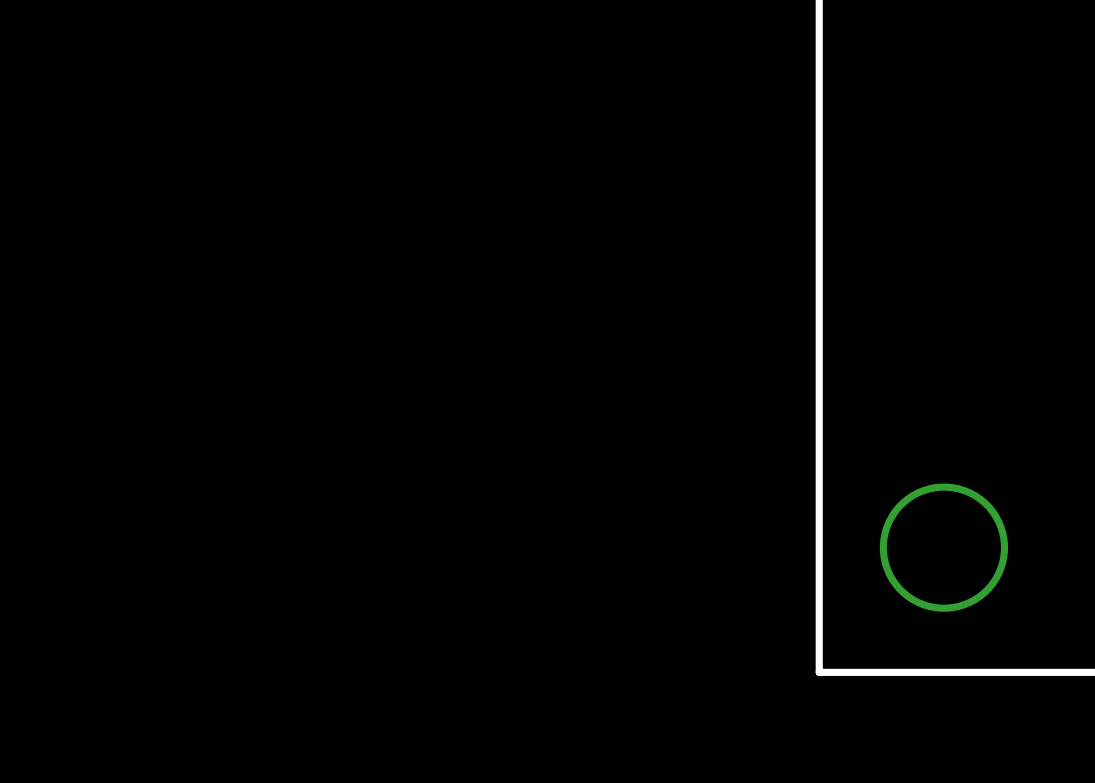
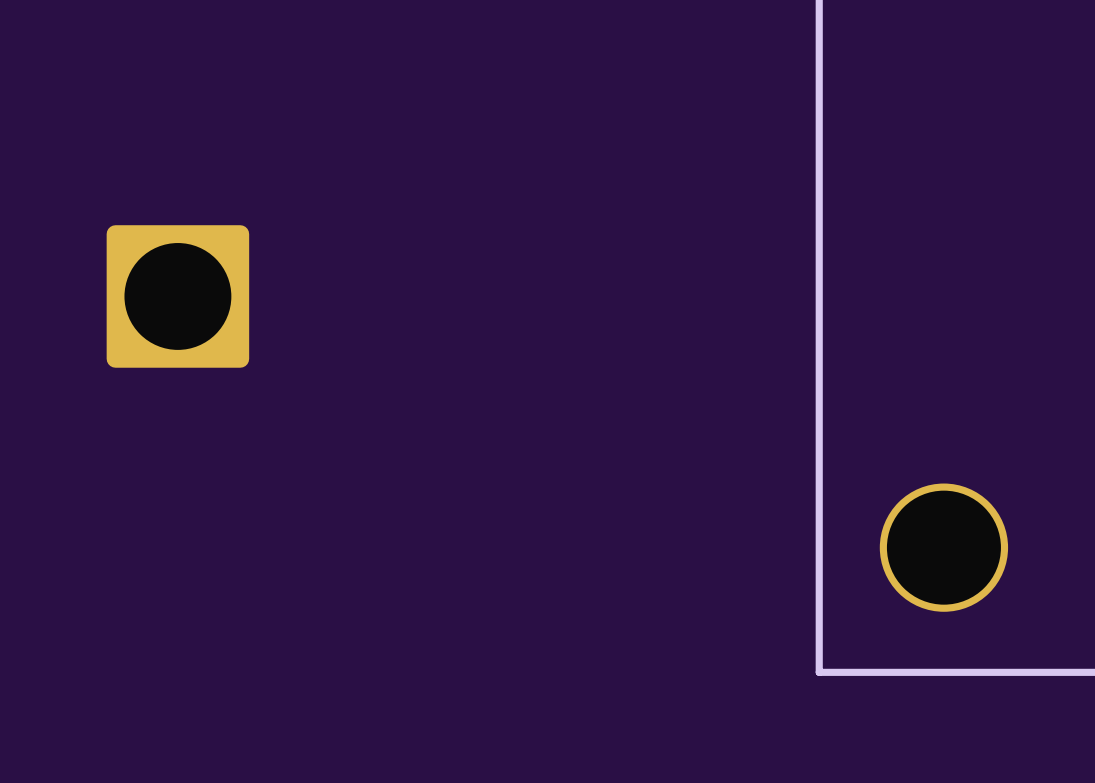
part: none -> (177, 296)

